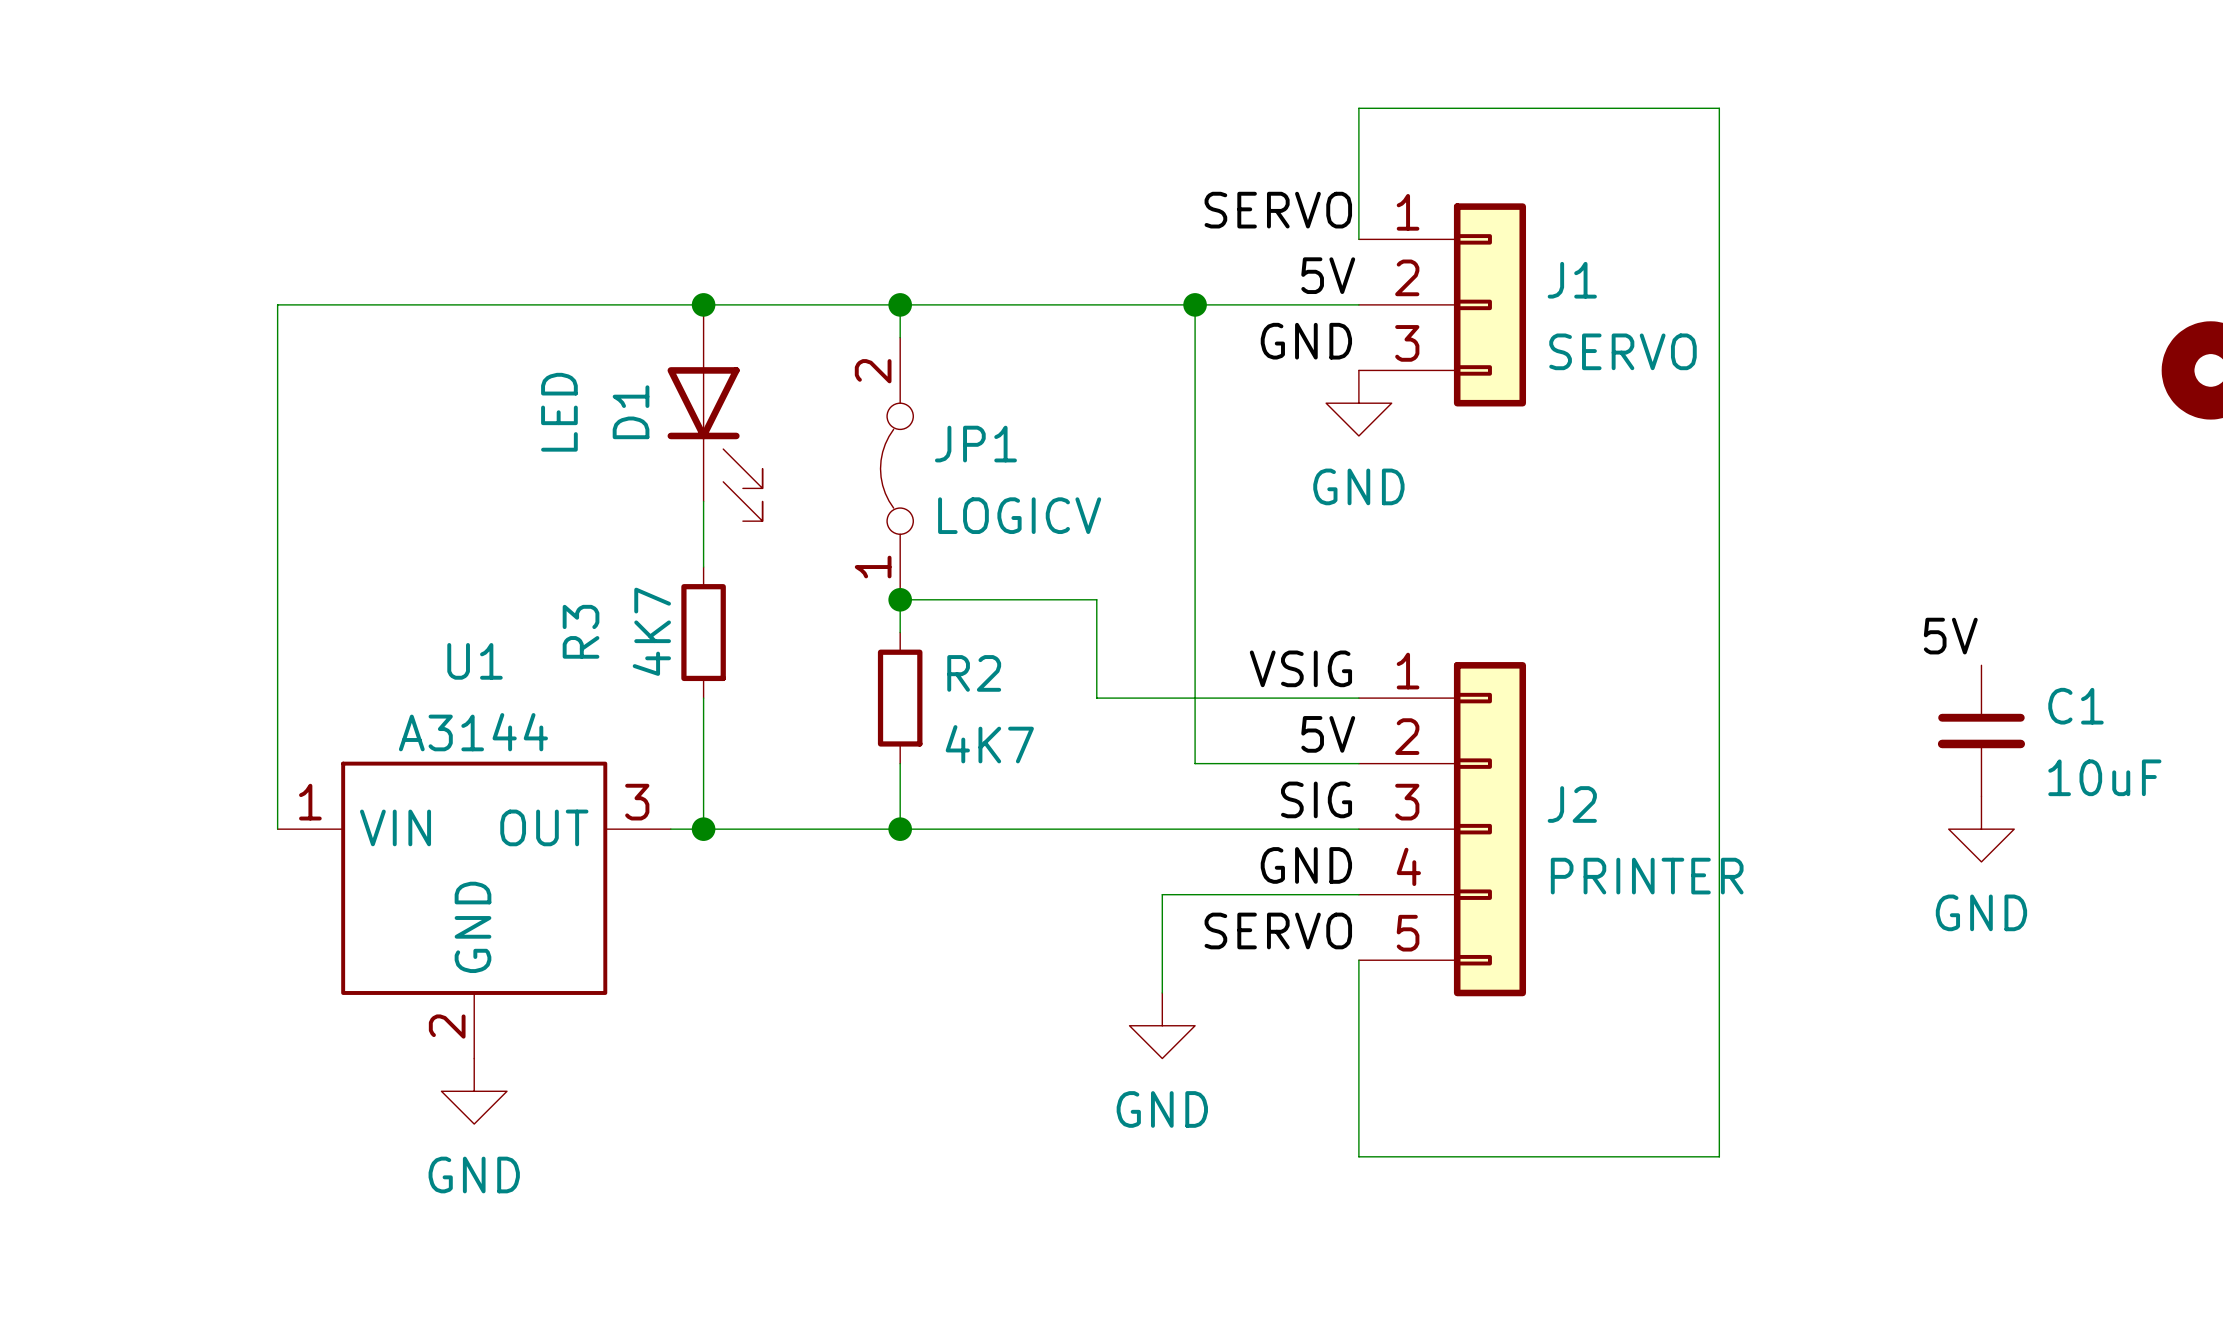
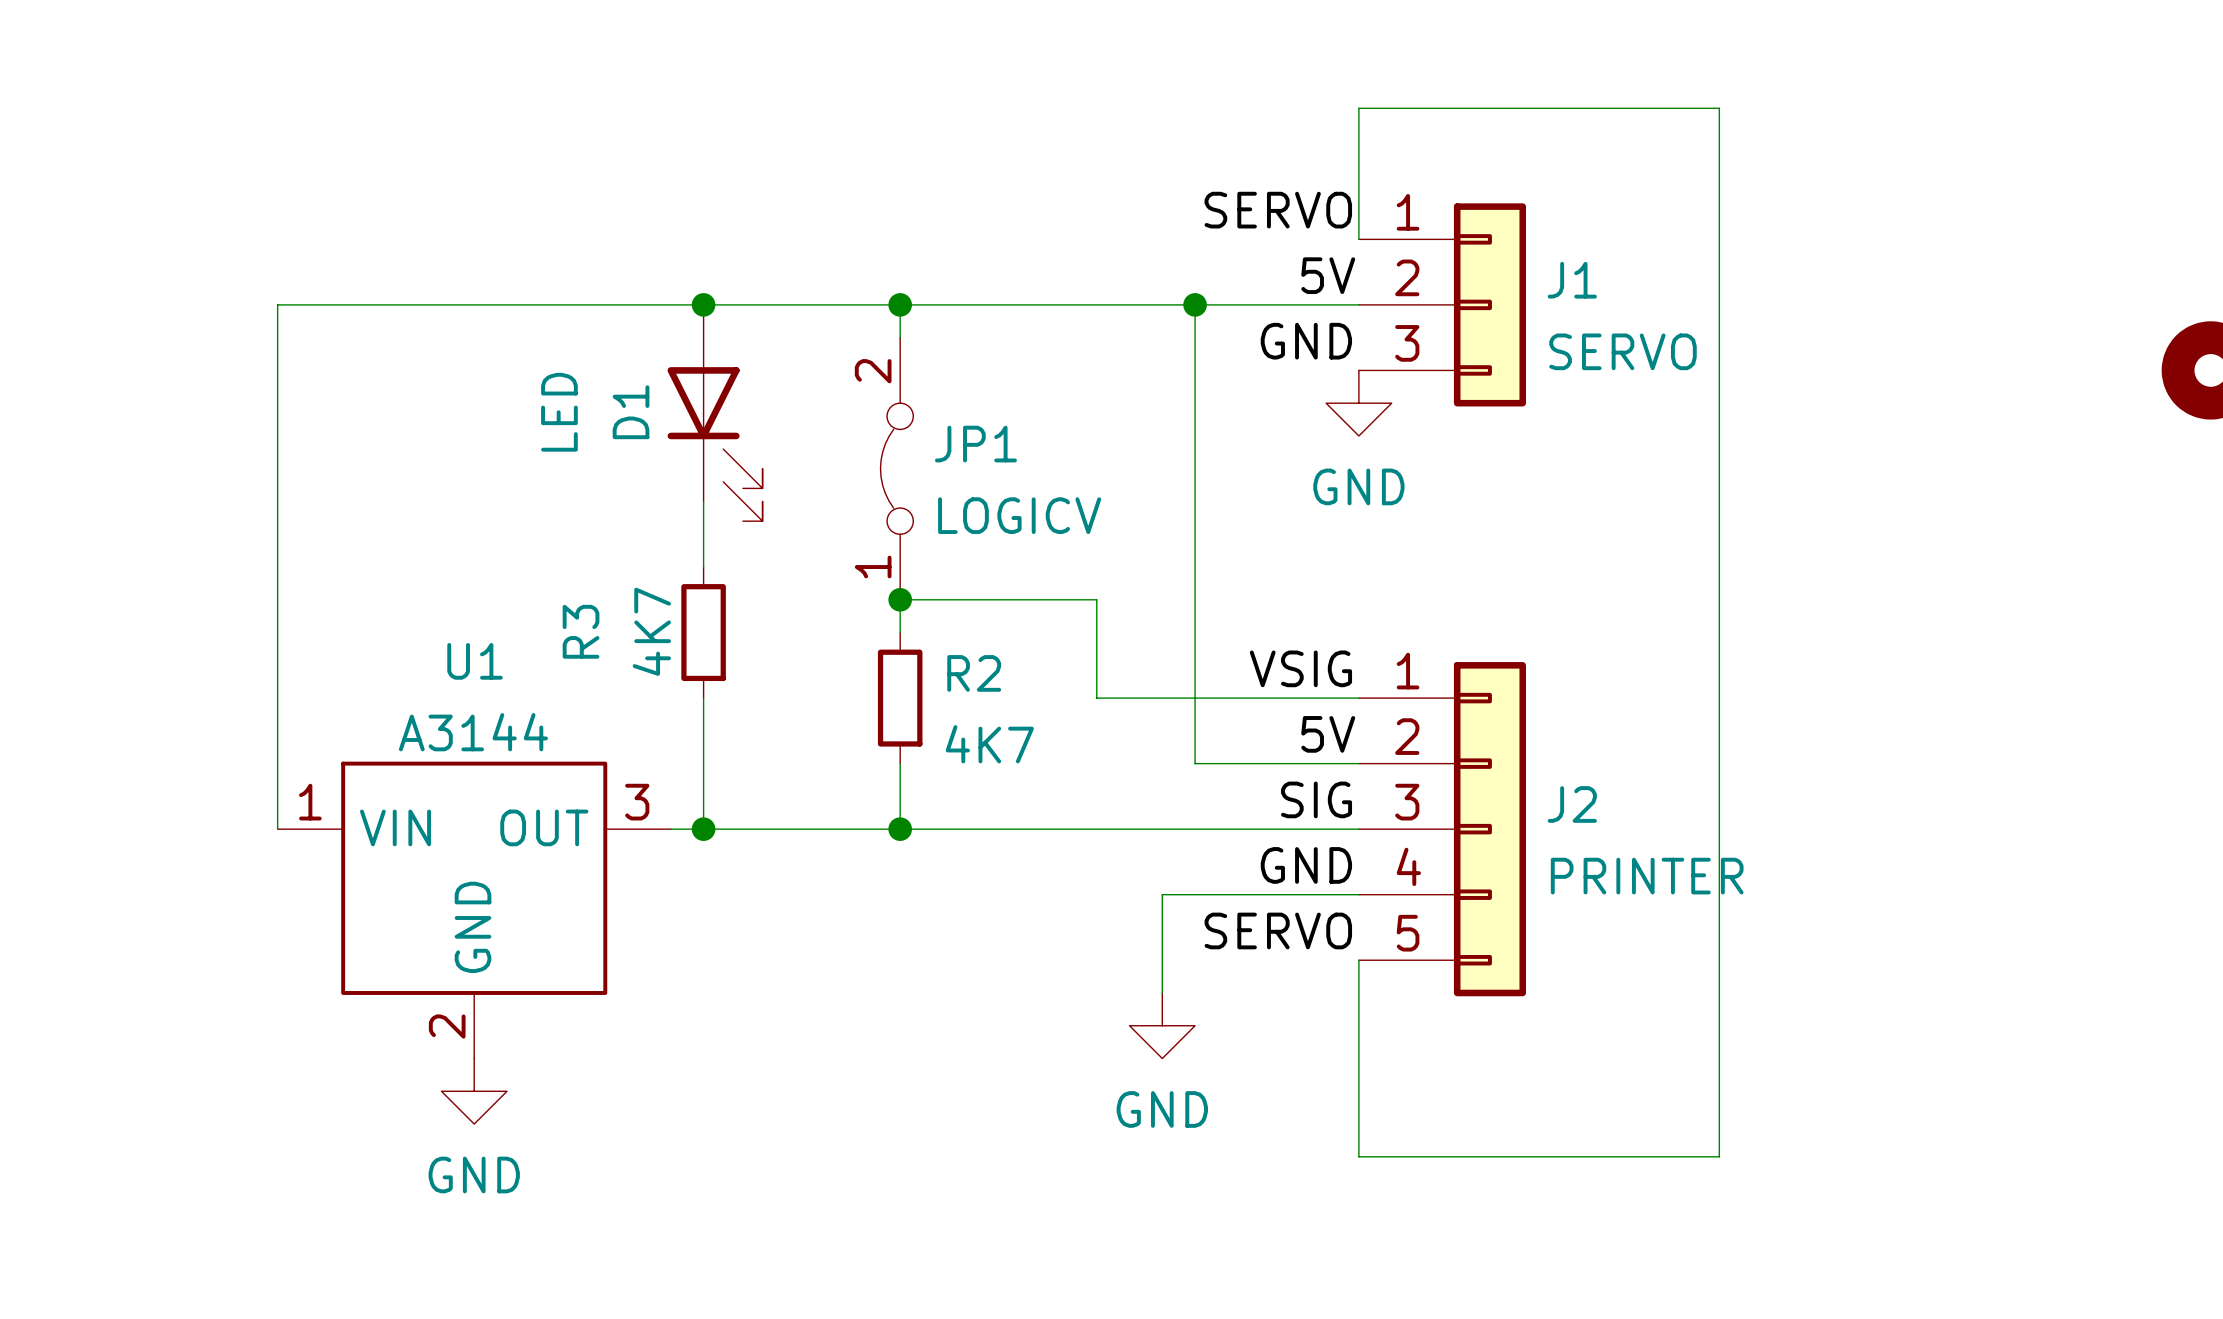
label: 5V (1950, 636) -> none
C1: 10uF (1981, 730) -> none
power symbol: GND (1981, 829) -> none

